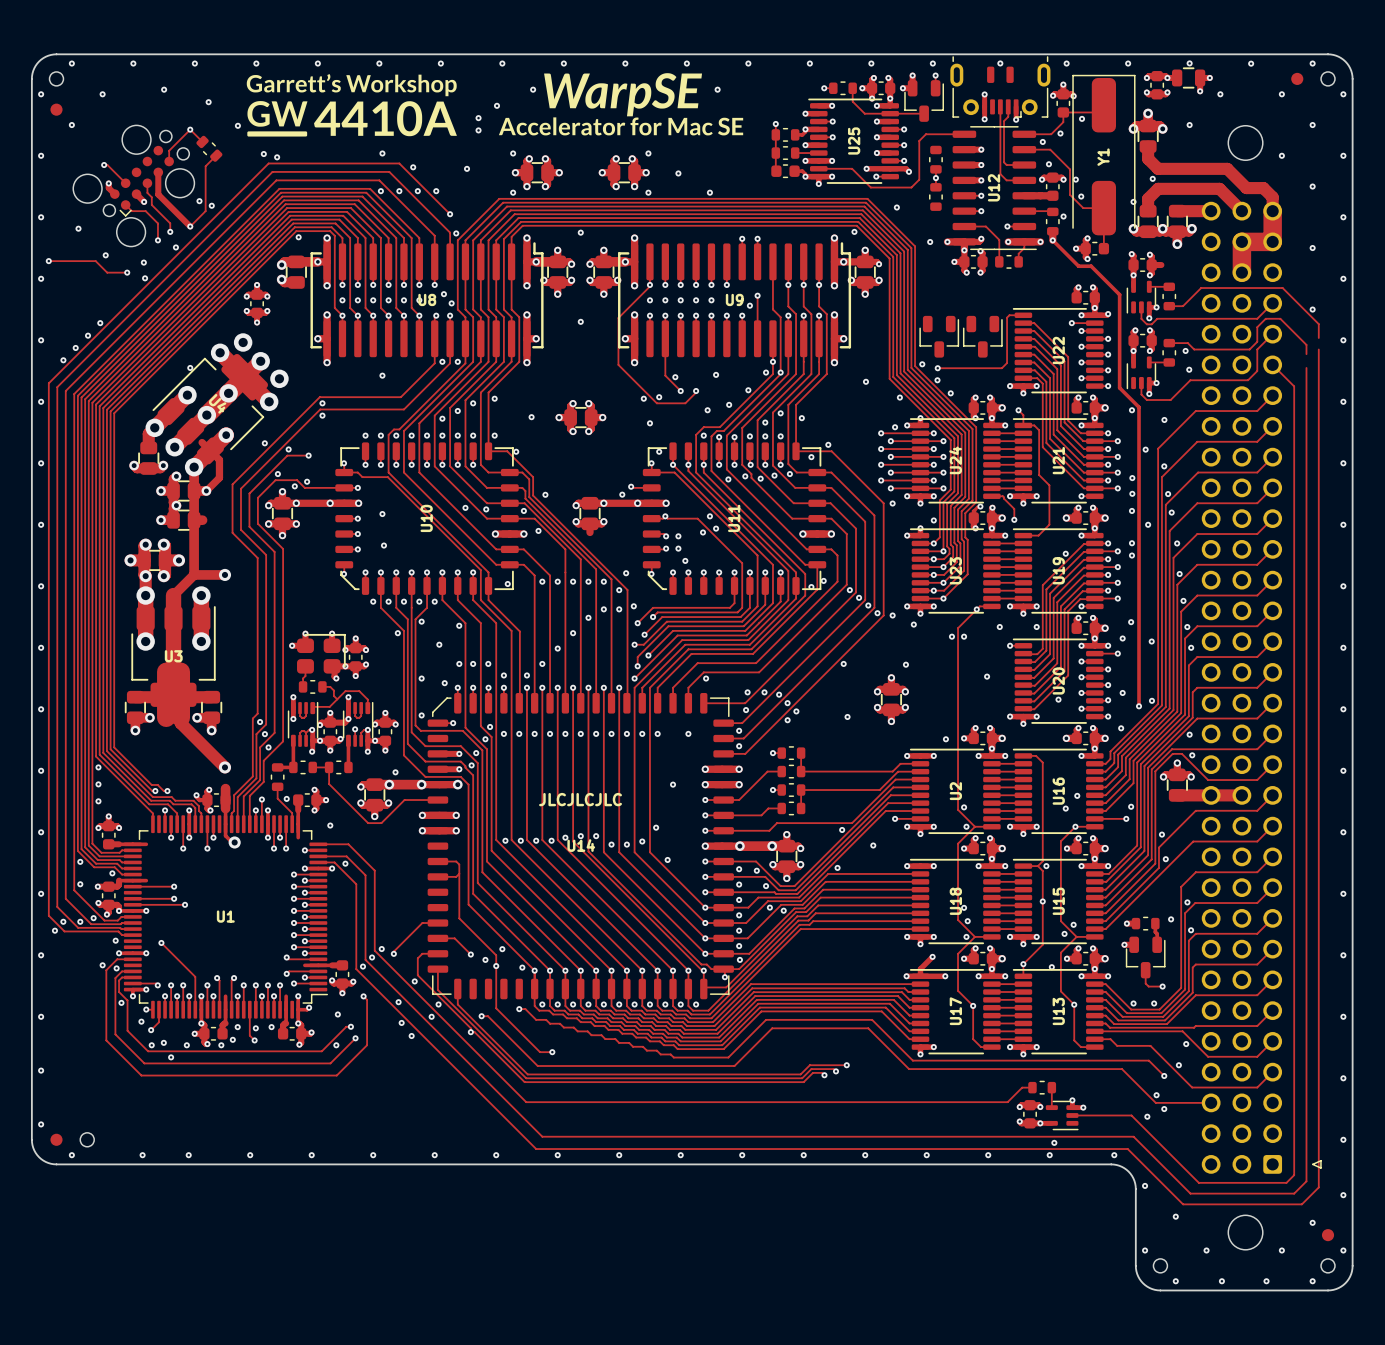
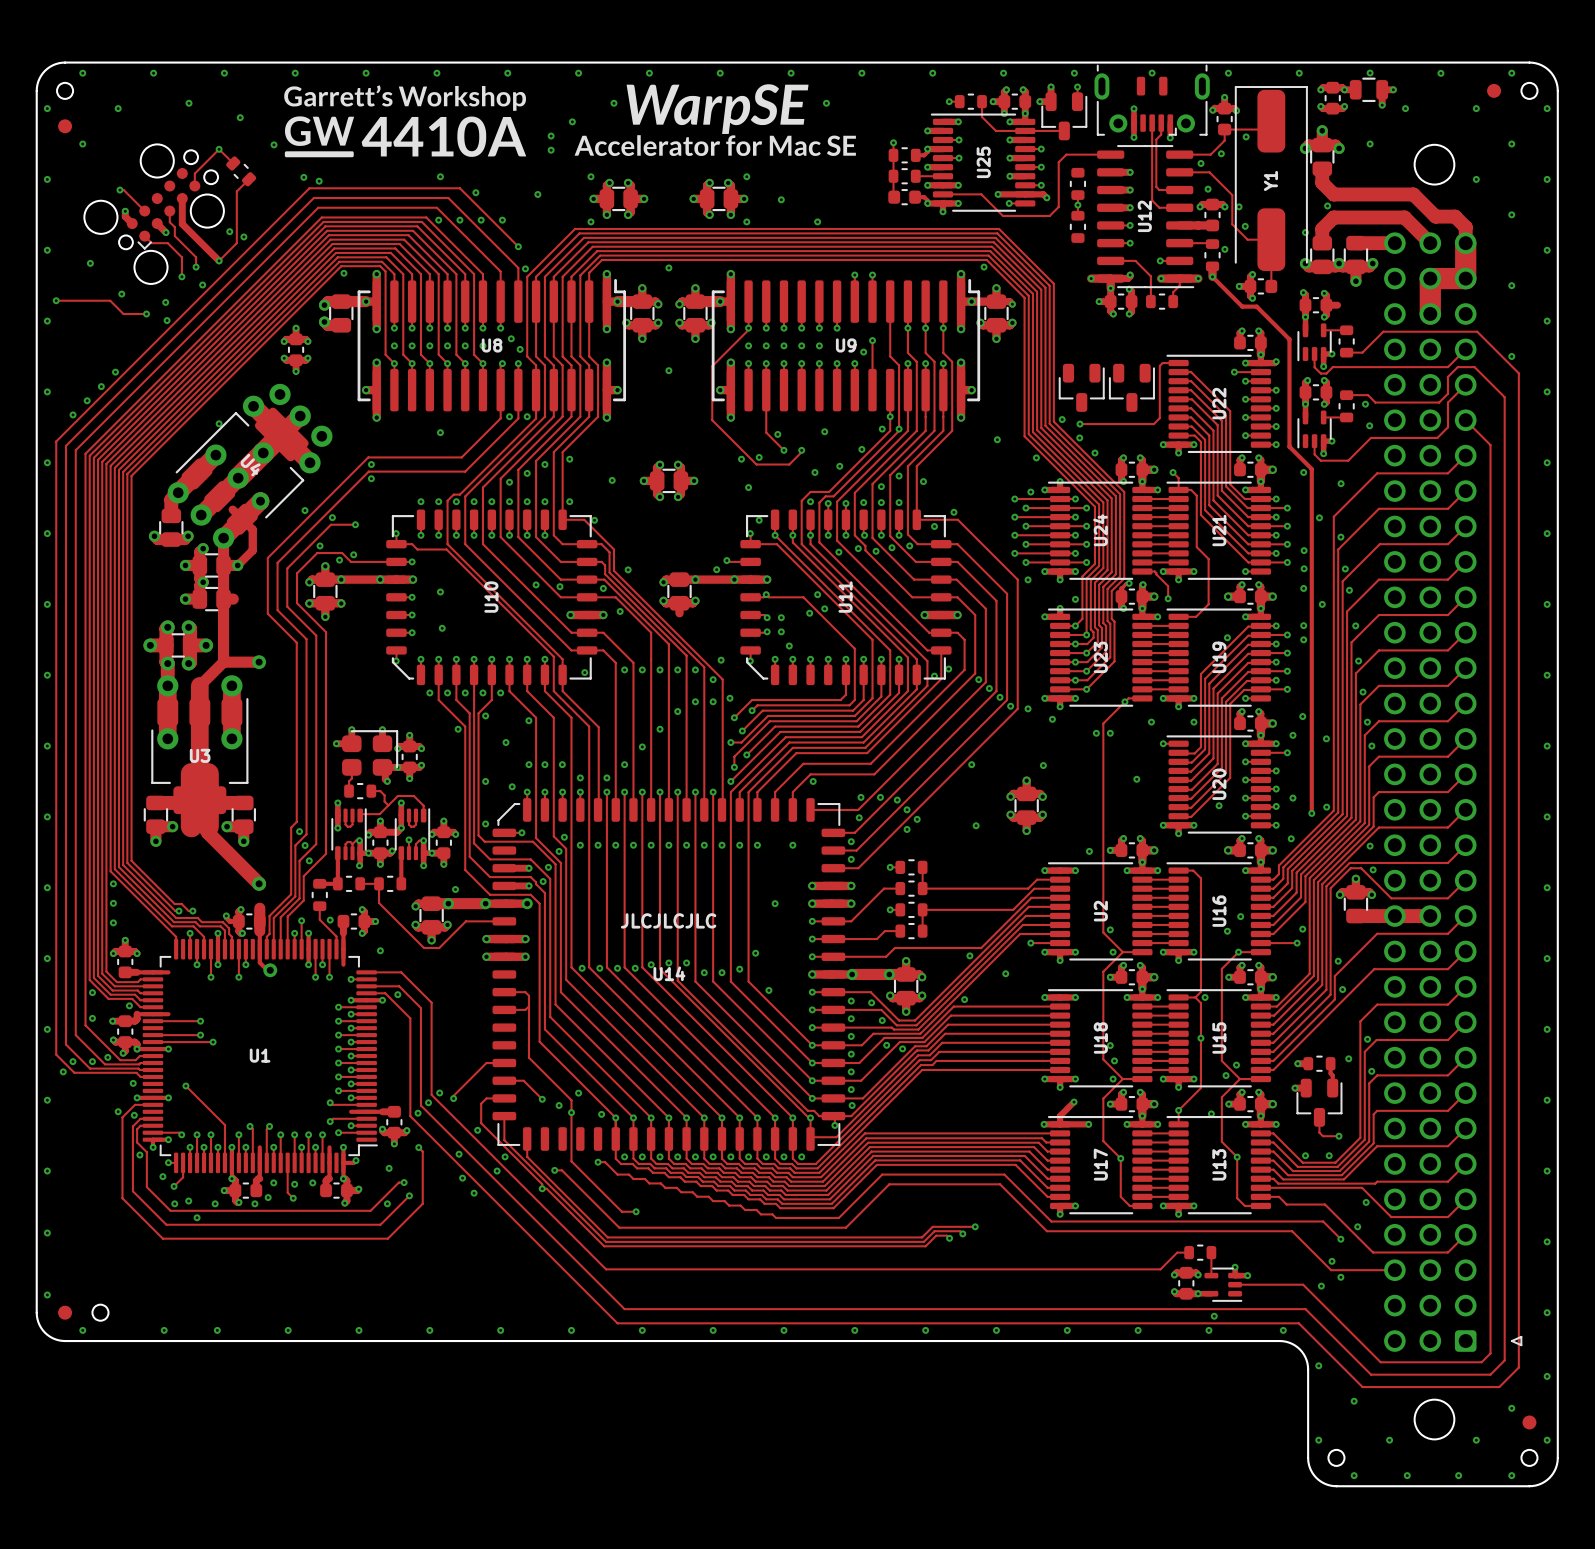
via: (896, 207) -> none
via: (930, 242) -> none
track: none -> (1518, 389) (1518, 402)
track: none -> (1504, 407) (1504, 423)

